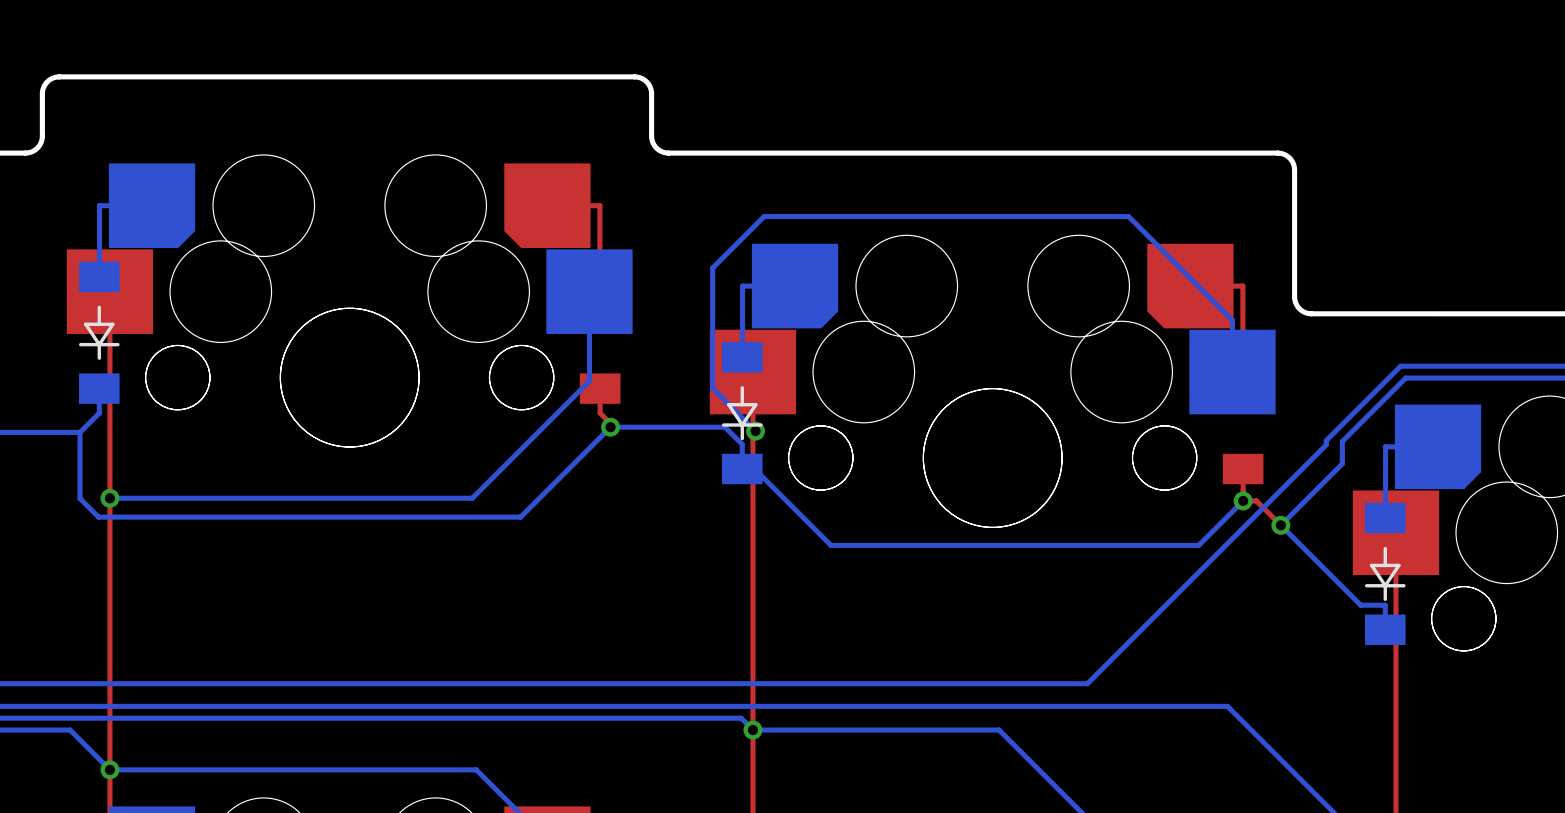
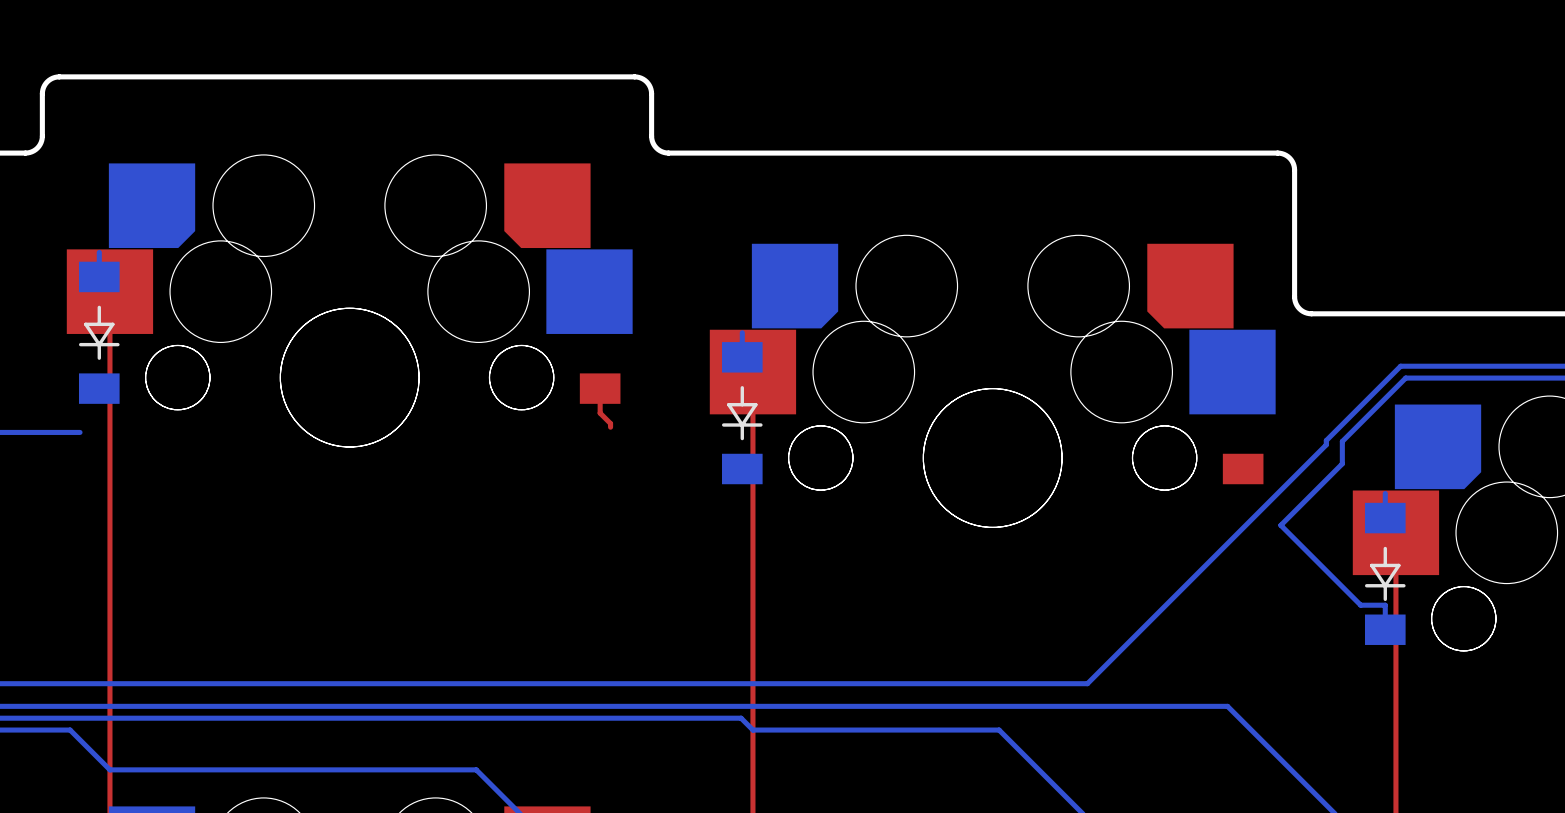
bottom track: (152, 205) (99, 205) (99, 252) -> none
top track: (547, 205) (599, 205) (599, 252) -> none
bottom track: (795, 286) (742, 286) (742, 332) -> none
top track: (1190, 286) (1242, 286) (1242, 332) -> none
bottom track: (589, 291) (589, 381) (472, 498) (109, 498) -> none
bottom track: (1232, 372) (1232, 320) (1128, 216) (764, 216) (712, 267) (712, 388) (755, 431) -> none
bottom track: (99, 388) (99, 413) (80, 432) (80, 498) (98, 517) (520, 517) (610, 427) (725, 427) (742, 444) (742, 469) -> none
via: (610, 427) -> none
via: (755, 431) -> none
bottom track: (1438, 446) (1385, 446) (1385, 493) -> none
bottom track: (742, 456) (830, 545) (1198, 545) (1243, 500) -> none
top track: (1243, 469) (1243, 500) (1256, 500) (1280, 525) -> none
via: (109, 498) -> none
via: (1243, 500) -> none
via: (1280, 525) -> none
via: (752, 730) -> none
via: (109, 769) -> none

